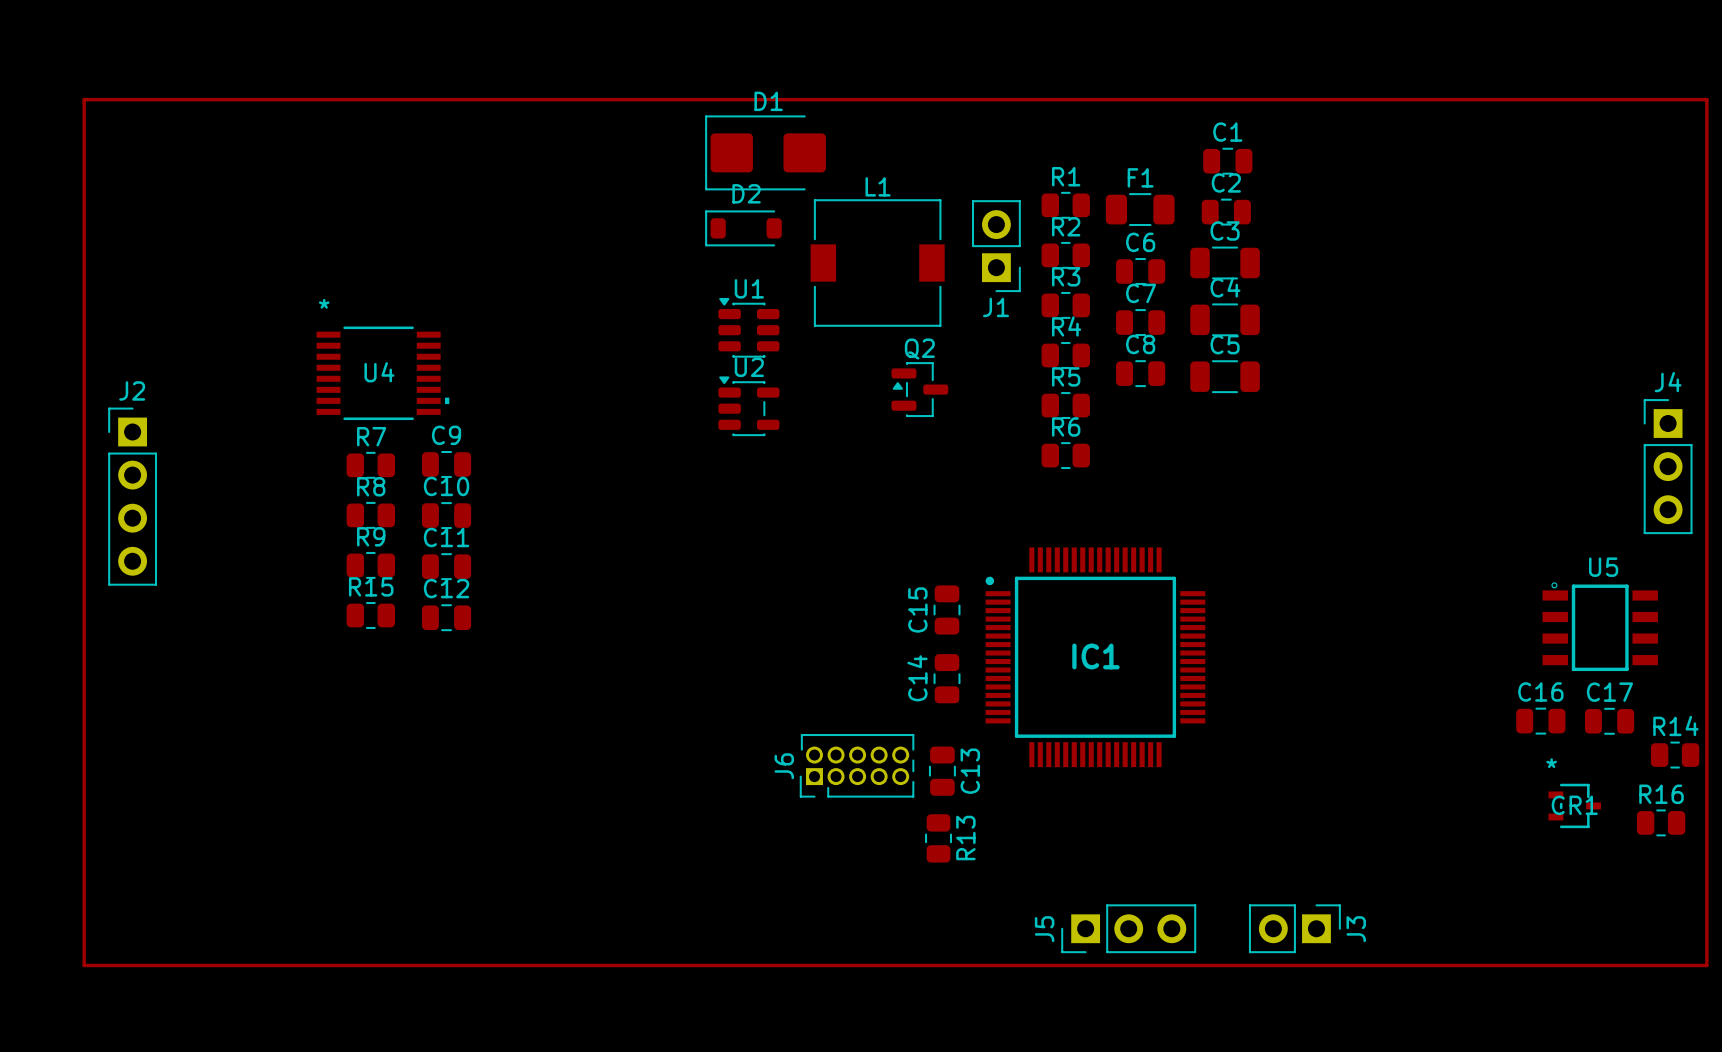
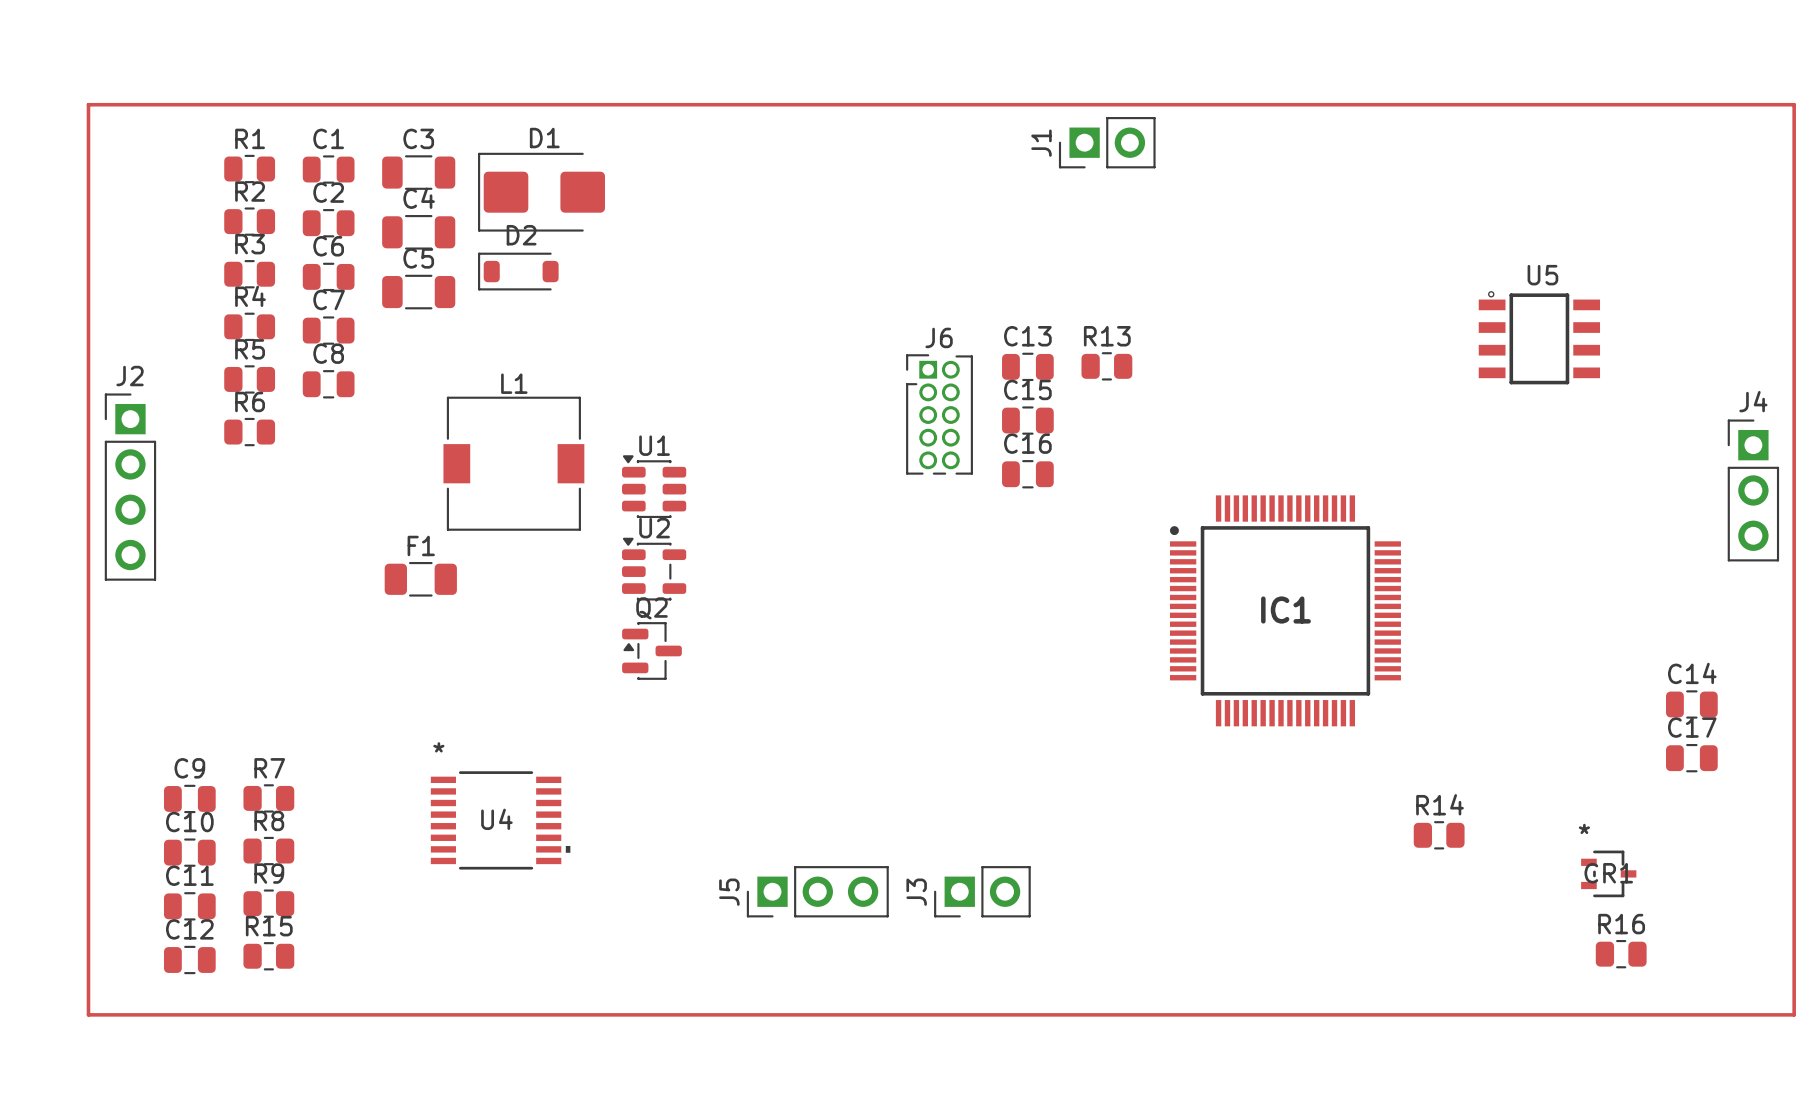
D1 position: (765, 152) -> (541, 192)
C1 position: (1227, 161) -> (328, 169)
R1 position: (1065, 205) -> (249, 169)
F1 position: (1140, 209) -> (420, 579)
C2 position: (1226, 212) -> (328, 223)
D2 position: (743, 228) -> (518, 271)
J1 rotation: 0° (996, 246) -> 90° clockwise (1107, 142)
J1 position: (996, 246) -> (1107, 142)
R2 position: (1065, 255) -> (249, 221)
L1 position: (877, 263) -> (513, 463)
C3 position: (1225, 263) -> (418, 172)
C6 position: (1140, 271) -> (328, 276)
R3 position: (1065, 305) -> (249, 274)
C4 position: (1225, 319) -> (418, 232)
C7 position: (1140, 322) -> (328, 330)
U1 position: (748, 327) -> (654, 486)
R4 position: (1065, 355) -> (249, 326)
U4 position: (382, 373) -> (500, 820)
C8 position: (1140, 373) -> (328, 384)
C5 position: (1225, 376) -> (418, 292)
Q2 position: (919, 389) -> (651, 650)
R5 position: (1065, 405) -> (249, 379)
U2 position: (748, 406) -> (654, 569)
R6 position: (1065, 455) -> (249, 432)
C9 position: (446, 464) -> (189, 798)
R7 position: (370, 465) -> (268, 798)
J2 position: (132, 496) -> (130, 487)
R8 position: (370, 515) -> (268, 851)
C10 position: (446, 515) -> (189, 852)
R9 position: (370, 565) -> (268, 903)
C11 position: (446, 566) -> (189, 906)
C15 rotation: 0° (947, 609) -> 90° clockwise (1027, 420)
C15 position: (947, 609) -> (1027, 420)
R15 position: (370, 615) -> (268, 956)
C12 position: (446, 617) -> (189, 960)
U5 position: (1600, 626) -> (1539, 337)
IC1 position: (1095, 657) -> (1285, 610)
C14 rotation: 0° (947, 678) -> 90° clockwise (1691, 704)
C14 position: (947, 678) -> (1691, 704)
C16 position: (1540, 721) -> (1027, 474)
R14 position: (1675, 755) -> (1439, 835)
J6 rotation: 0° (857, 765) -> 90° clockwise (939, 414)
J6 position: (857, 765) -> (939, 414)
C13 rotation: 0° (942, 771) -> 90° clockwise (1027, 366)
C13 position: (942, 771) -> (1027, 366)
C13 name position: C13 (970, 771) -> C13 (1027, 336)
CR1 position: (1574, 805) -> (1608, 873)
R16 position: (1661, 822) -> (1621, 954)
R13 name position: R13 (965, 837) -> R13 (1107, 336)
R13 rotation: 0° (938, 838) -> 90° clockwise (1106, 366)
R13 position: (938, 838) -> (1106, 366)
J5 position: (1128, 928) -> (817, 891)
J3 rotation: 0° (1294, 928) -> 180° (982, 891)
J3 position: (1294, 928) -> (982, 891)

